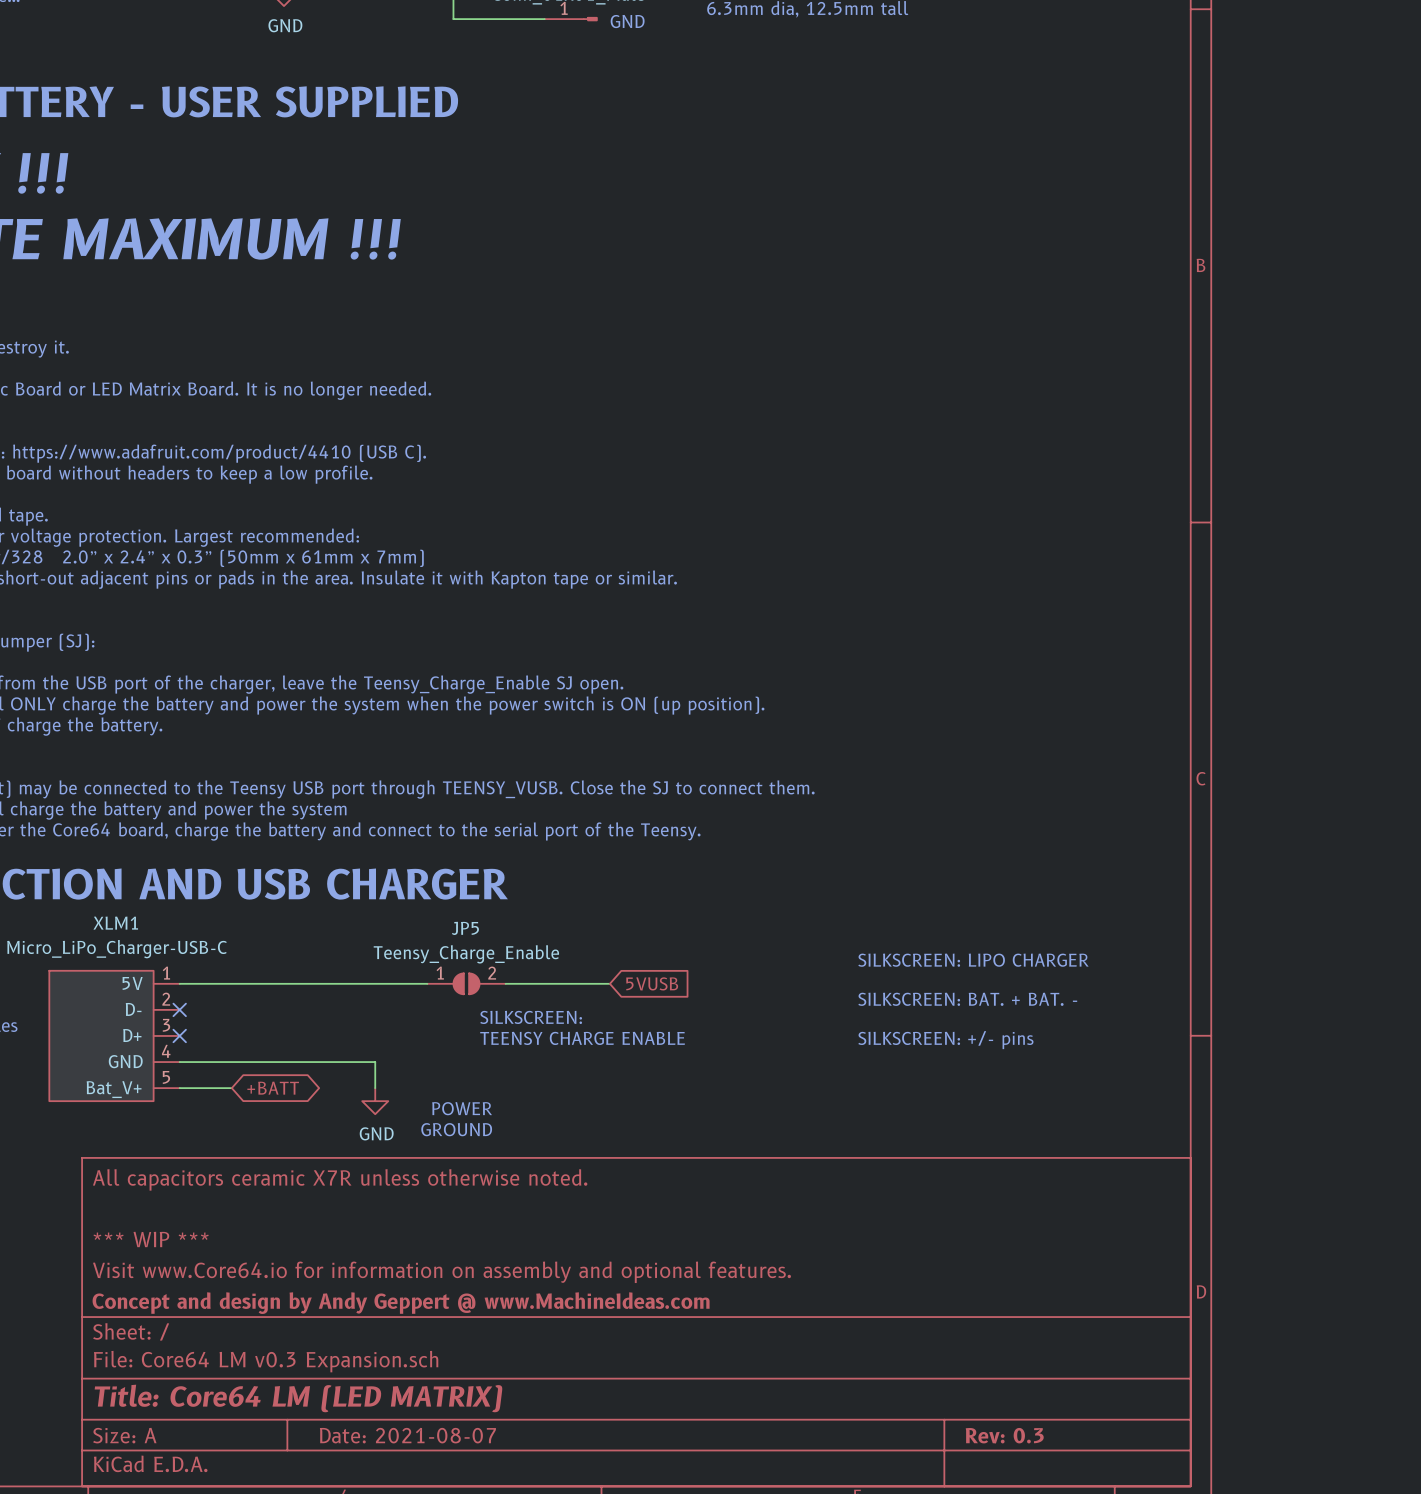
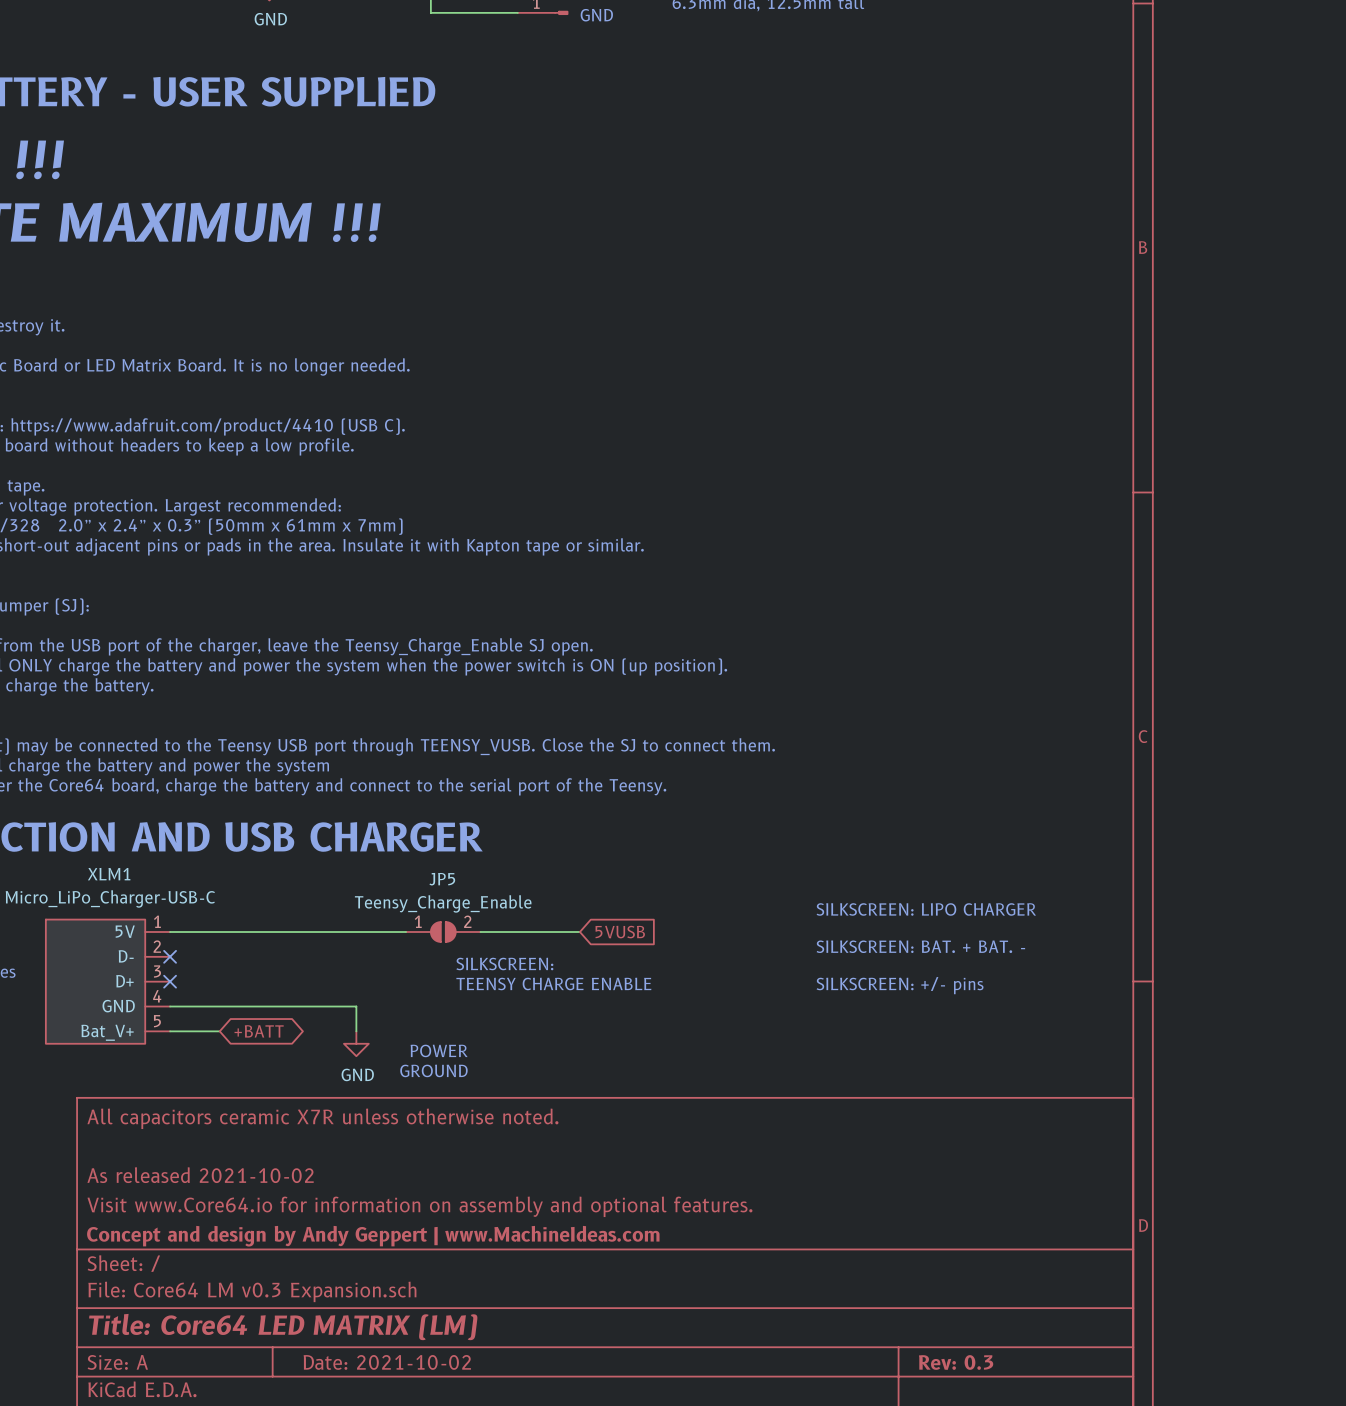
title block: *** WIP *** (151, 1239) -> As released 2021-10-02 (200, 1175)
title block: Concept and design by Andy Geppert @ www.MachineIdeas.com (401, 1303) -> Concept and design by Andy Geppert | www.MachineIdeas.com (373, 1236)
title block: Title: Core64 LM (LED MATRIX) (298, 1398) -> Title: Core64 LED MATRIX (LM) (283, 1327)
title block: Date: 2021-08-07 (407, 1435) -> Date: 2021-10-02 (387, 1362)

